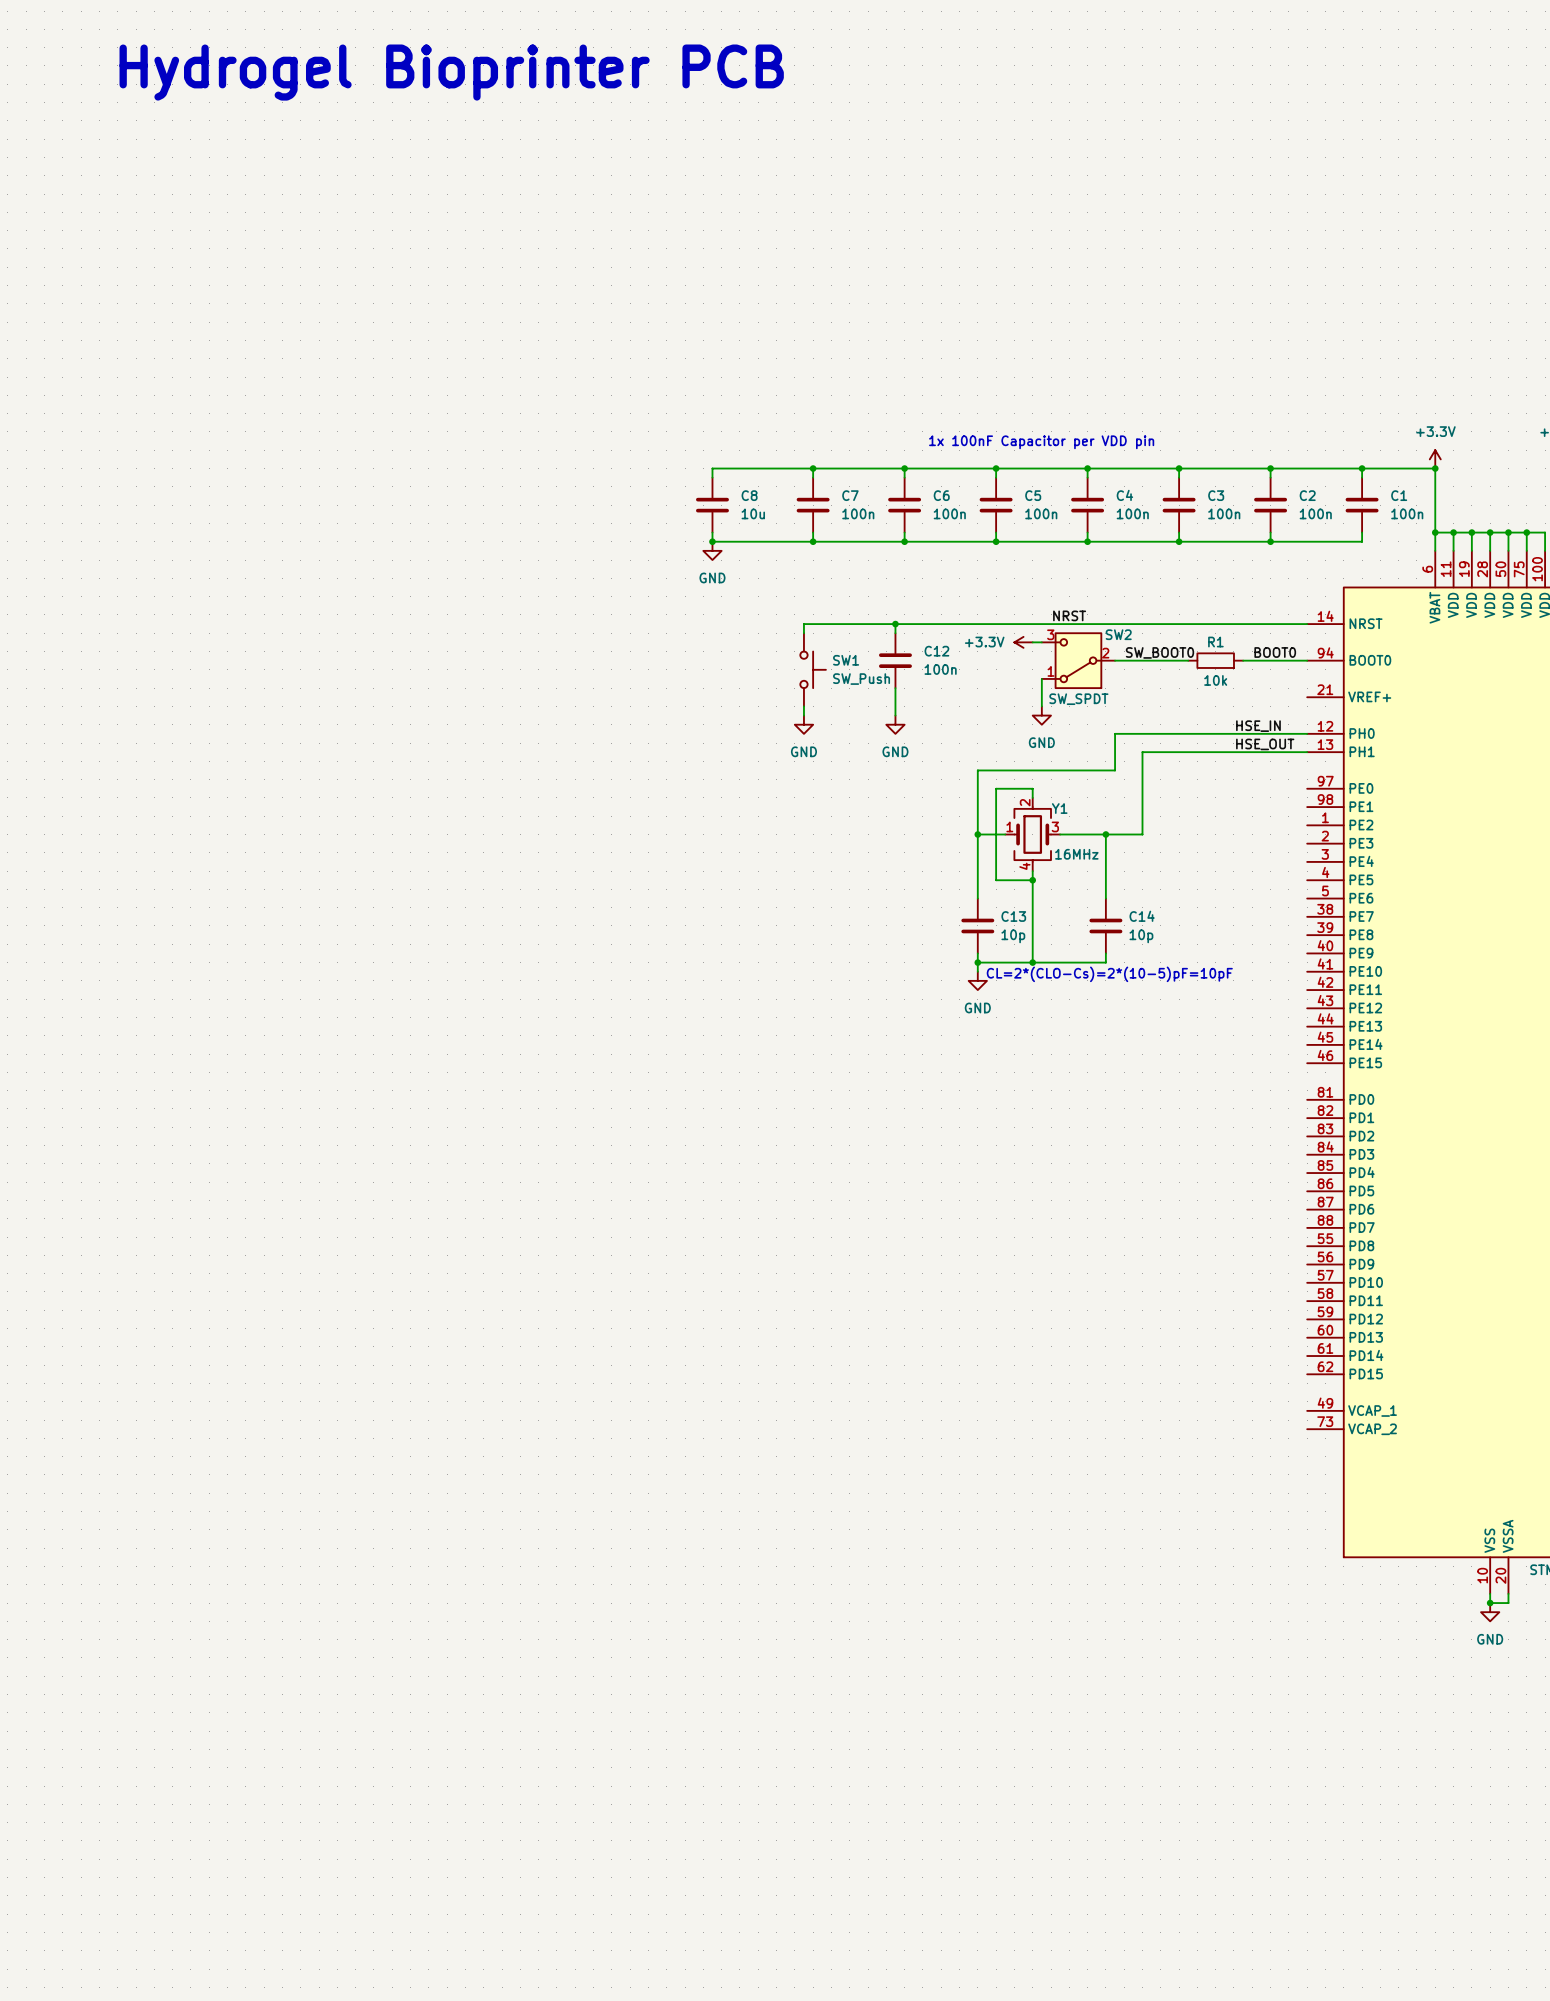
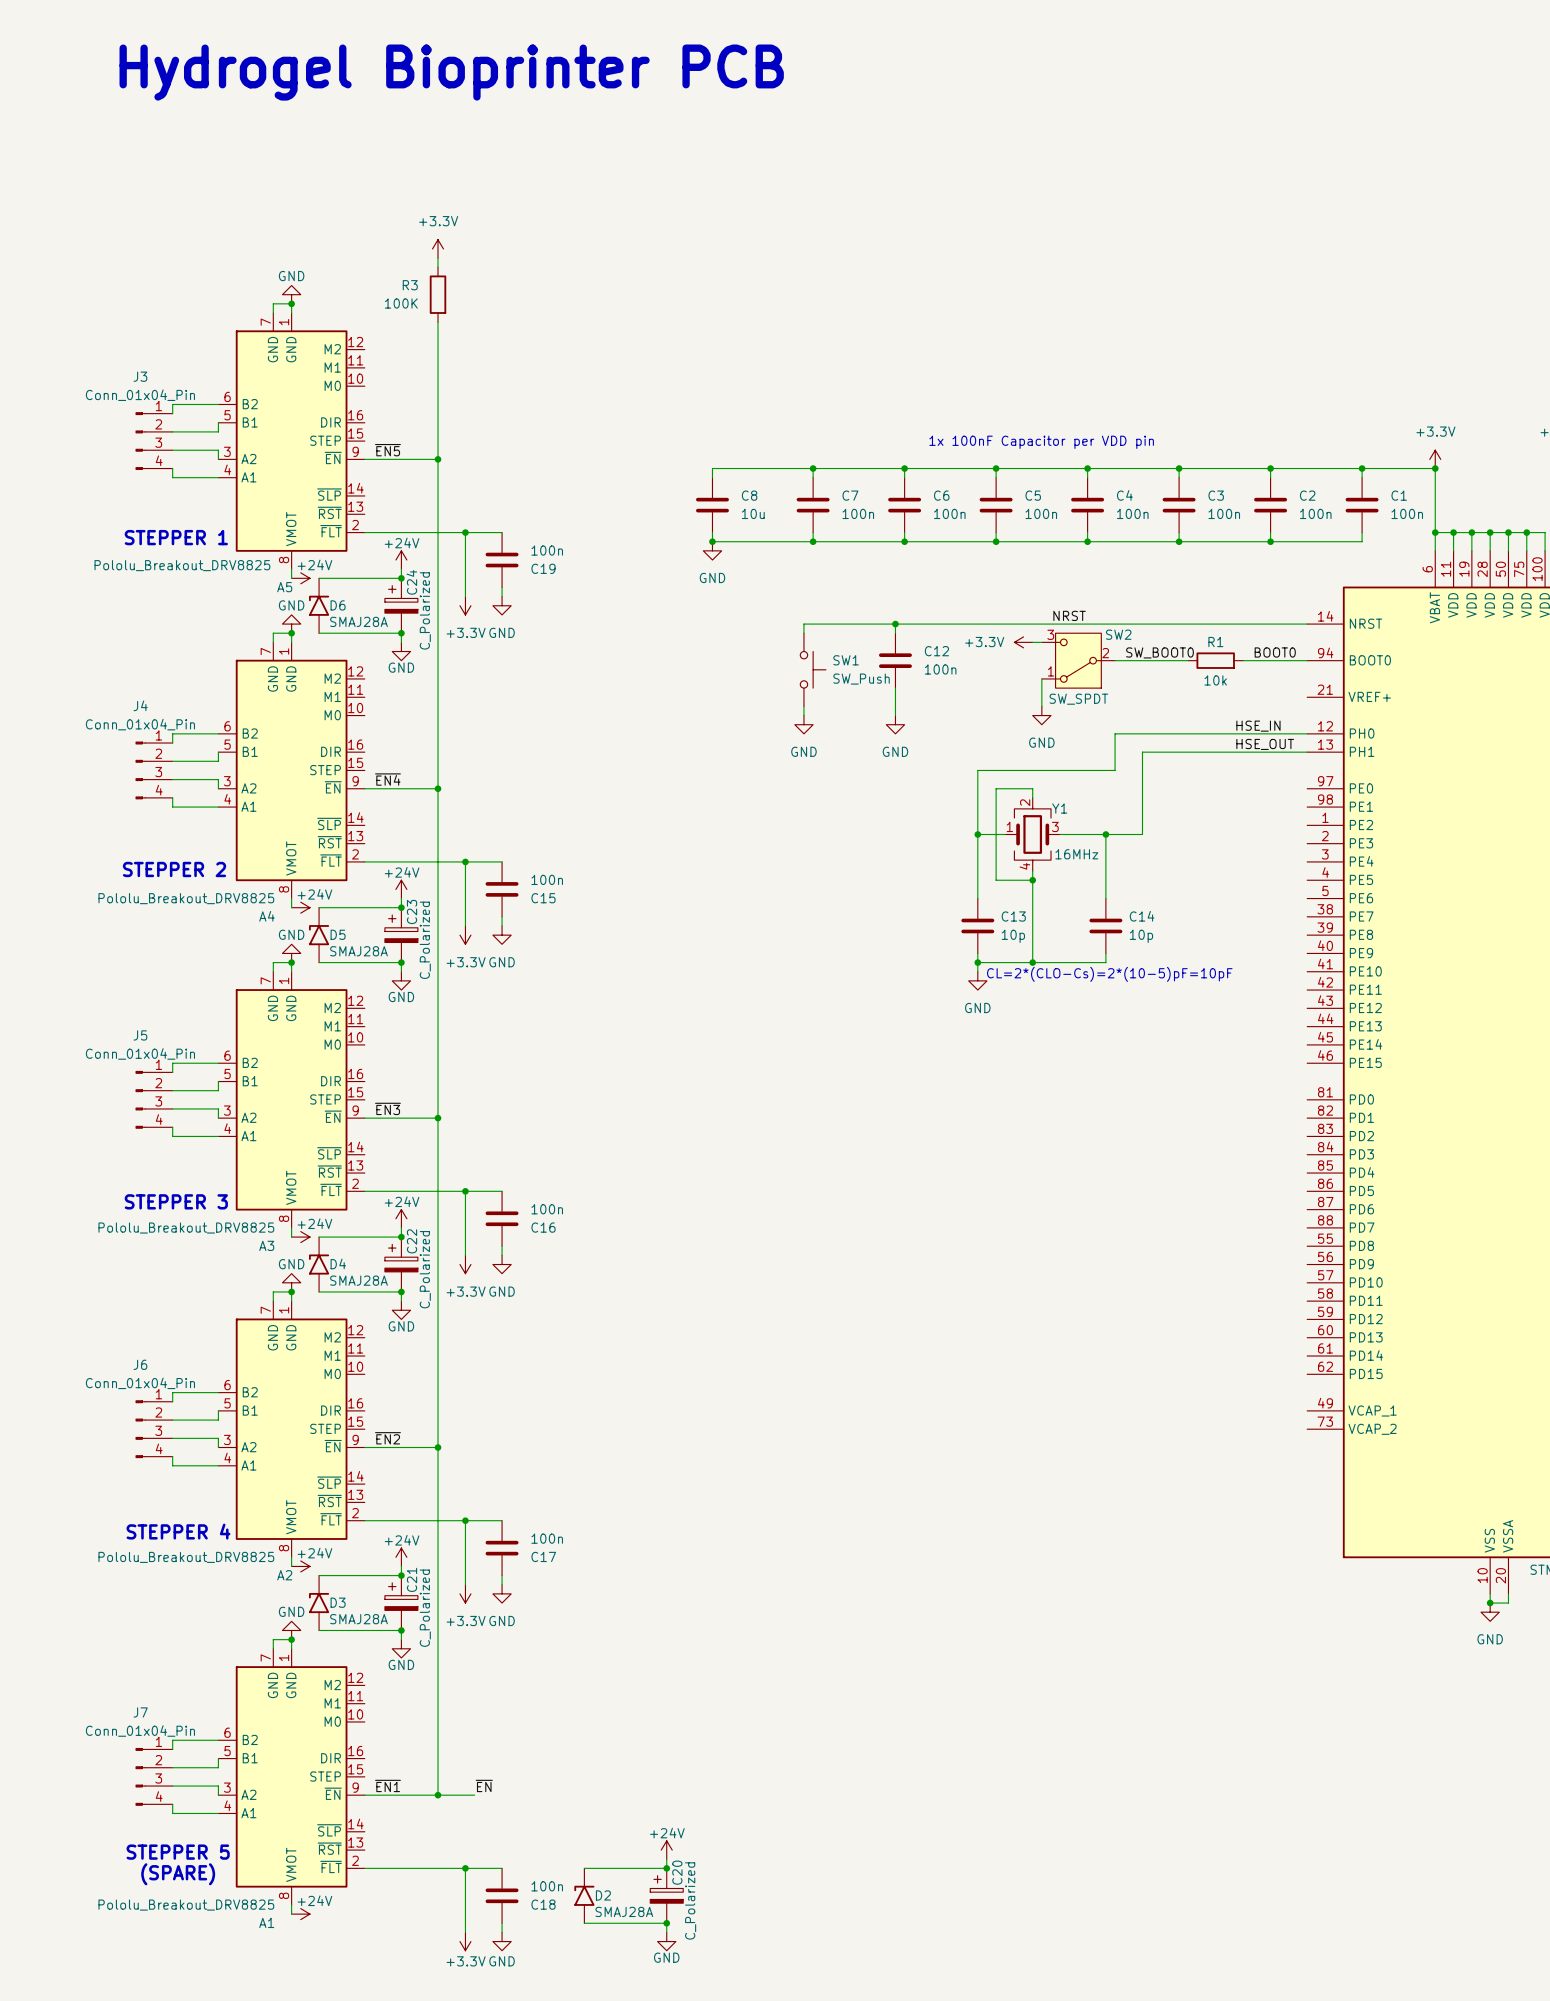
power symbol: none -> +3.3V (438, 248)
wire: none -> (438, 258) (438, 267)
power symbol: none -> GND (291, 294)
R3: none -> 100K (438, 294)
junction: none -> (291, 303)
wire: none -> (273, 312) (273, 303) (291, 303) (291, 312)
wire: none -> (438, 322) (438, 1795)
wire: none -> (218, 404) (172, 404) (172, 413)
wire: none -> (218, 422) (218, 431) (172, 431)
J3: none -> Conn_01x04_Pin (154, 441)
A5: none -> Pololu_Breakout_DRV8825 (291, 441)
wire: none -> (172, 450) (218, 450) (218, 459)
label: none -> ~{EN5} (387, 450)
wire: none -> (364, 459) (438, 459)
junction: none -> (438, 459)
wire: none -> (172, 468) (172, 477) (218, 477)
wire: none -> (364, 532) (502, 532)
wire: none -> (465, 532) (465, 596)
junction: none -> (465, 532)
text: none -> STEPPER 1 (176, 537)
power symbol: none -> +24V (401, 560)
C19: none -> 100n (502, 560)
wire: none -> (291, 569) (291, 578)
wire: none -> (401, 569) (401, 578) (319, 578)
power symbol: none -> +24V (300, 578)
junction: none -> (401, 578)
wire: none -> (502, 587) (502, 596)
D6: none -> SMAJ28A (319, 605)
C24: none -> C_Polarized (401, 605)
power symbol: none -> +3.3V (465, 605)
power symbol: none -> GND (502, 605)
power symbol: none -> GND (291, 624)
junction: none -> (291, 633)
wire: none -> (319, 633) (401, 633) (401, 642)
junction: none -> (401, 633)
wire: none -> (273, 642) (273, 633) (291, 633) (291, 642)
power symbol: none -> GND (401, 651)
wire: none -> (218, 733) (172, 733) (172, 743)
wire: none -> (218, 752) (218, 761) (172, 761)
J4: none -> Conn_01x04_Pin (154, 770)
A4: none -> Pololu_Breakout_DRV8825 (291, 770)
wire: none -> (172, 779) (218, 779) (218, 788)
label: none -> ~{EN4} (387, 779)
wire: none -> (364, 788) (438, 788)
junction: none -> (438, 788)
wire: none -> (172, 797) (172, 807) (218, 807)
wire: none -> (364, 861) (502, 861)
wire: none -> (465, 861) (465, 925)
junction: none -> (465, 861)
text: none -> STEPPER 2 (174, 869)
power symbol: none -> +24V (401, 889)
C15: none -> 100n (502, 889)
wire: none -> (291, 898) (291, 907)
wire: none -> (401, 898) (401, 907) (319, 907)
power symbol: none -> +24V (300, 907)
junction: none -> (401, 907)
wire: none -> (502, 916) (502, 925)
D5: none -> SMAJ28A (319, 935)
C23: none -> C_Polarized (401, 935)
power symbol: none -> +3.3V (465, 935)
power symbol: none -> GND (502, 935)
power symbol: none -> GND (291, 953)
junction: none -> (291, 962)
wire: none -> (319, 962) (401, 962) (401, 971)
junction: none -> (401, 962)
wire: none -> (273, 971) (273, 962) (291, 962) (291, 971)
power symbol: none -> GND (401, 980)
wire: none -> (218, 1063) (172, 1063) (172, 1072)
wire: none -> (218, 1081) (218, 1090) (172, 1090)
J5: none -> Conn_01x04_Pin (154, 1099)
A3: none -> Pololu_Breakout_DRV8825 (291, 1099)
wire: none -> (172, 1108) (218, 1108) (218, 1118)
label: none -> ~{EN3} (387, 1108)
wire: none -> (364, 1118) (438, 1118)
junction: none -> (438, 1118)
wire: none -> (172, 1127) (172, 1136) (218, 1136)
wire: none -> (364, 1191) (502, 1191)
wire: none -> (465, 1191) (465, 1255)
junction: none -> (465, 1191)
text: none -> STEPPER 3 (176, 1201)
power symbol: none -> +24V (401, 1218)
C16: none -> 100n (502, 1218)
wire: none -> (291, 1227) (291, 1237)
wire: none -> (401, 1227) (401, 1237) (319, 1237)
power symbol: none -> +24V (300, 1237)
junction: none -> (401, 1237)
wire: none -> (502, 1246) (502, 1255)
D4: none -> SMAJ28A (319, 1264)
C22: none -> C_Polarized (401, 1264)
power symbol: none -> +3.3V (465, 1264)
power symbol: none -> GND (502, 1264)
power symbol: none -> GND (291, 1282)
junction: none -> (291, 1291)
wire: none -> (319, 1291) (401, 1291) (401, 1301)
junction: none -> (401, 1291)
wire: none -> (273, 1301) (273, 1291) (291, 1291) (291, 1301)
power symbol: none -> GND (401, 1310)
wire: none -> (218, 1392) (172, 1392) (172, 1401)
wire: none -> (218, 1410) (218, 1420) (172, 1420)
J6: none -> Conn_01x04_Pin (154, 1429)
A2: none -> Pololu_Breakout_DRV8825 (291, 1429)
wire: none -> (172, 1438) (218, 1438) (218, 1447)
label: none -> ~{EN2} (387, 1438)
wire: none -> (364, 1447) (438, 1447)
junction: none -> (438, 1447)
wire: none -> (172, 1456) (172, 1465) (218, 1465)
wire: none -> (364, 1520) (502, 1520)
wire: none -> (465, 1520) (465, 1584)
junction: none -> (465, 1520)
text: none -> STEPPER 4 (178, 1531)
C17: none -> 100n (502, 1548)
wire: none -> (291, 1557) (291, 1566)
power symbol: none -> +24V (401, 1557)
power symbol: none -> +24V (300, 1566)
wire: none -> (401, 1566) (401, 1575) (319, 1575)
junction: none -> (401, 1575)
wire: none -> (502, 1575) (502, 1584)
power symbol: none -> +3.3V (465, 1593)
power symbol: none -> GND (502, 1593)
D3: none -> SMAJ28A (319, 1603)
C21: none -> C_Polarized (401, 1603)
power symbol: none -> GND (291, 1630)
wire: none -> (319, 1630) (401, 1630) (401, 1639)
junction: none -> (401, 1630)
junction: none -> (291, 1639)
wire: none -> (273, 1648) (273, 1639) (291, 1639) (291, 1648)
power symbol: none -> GND (401, 1648)
wire: none -> (218, 1740) (172, 1740) (172, 1749)
wire: none -> (218, 1758) (218, 1767) (172, 1767)
J7: none -> Conn_01x04_Pin (154, 1776)
A1: none -> Pololu_Breakout_DRV8825 (291, 1776)
label: none -> ~{EN1} (387, 1785)
label: none -> ~{EN} (484, 1785)
wire: none -> (172, 1786) (218, 1786) (218, 1795)
wire: none -> (364, 1795) (474, 1795)
junction: none -> (438, 1795)
wire: none -> (172, 1804) (172, 1813) (218, 1813)
power symbol: none -> +24V (666, 1850)
text: none -> STEPPER 5 (178, 1852)
wire: none -> (666, 1859) (666, 1868) (584, 1868)
wire: none -> (364, 1868) (502, 1868)
wire: none -> (465, 1868) (465, 1932)
junction: none -> (465, 1868)
junction: none -> (666, 1868)
text: none -> (SPARE) (178, 1874)
C18: none -> 100n (502, 1895)
D2: none -> SMAJ28A (584, 1895)
C20: none -> C_Polarized (666, 1895)
wire: none -> (291, 1904) (291, 1914)
power symbol: none -> +24V (300, 1914)
wire: none -> (502, 1923) (502, 1932)
wire: none -> (584, 1923) (666, 1923) (666, 1932)
junction: none -> (666, 1923)
power symbol: none -> +3.3V (465, 1941)
power symbol: none -> GND (502, 1941)
power symbol: none -> GND (666, 1941)

